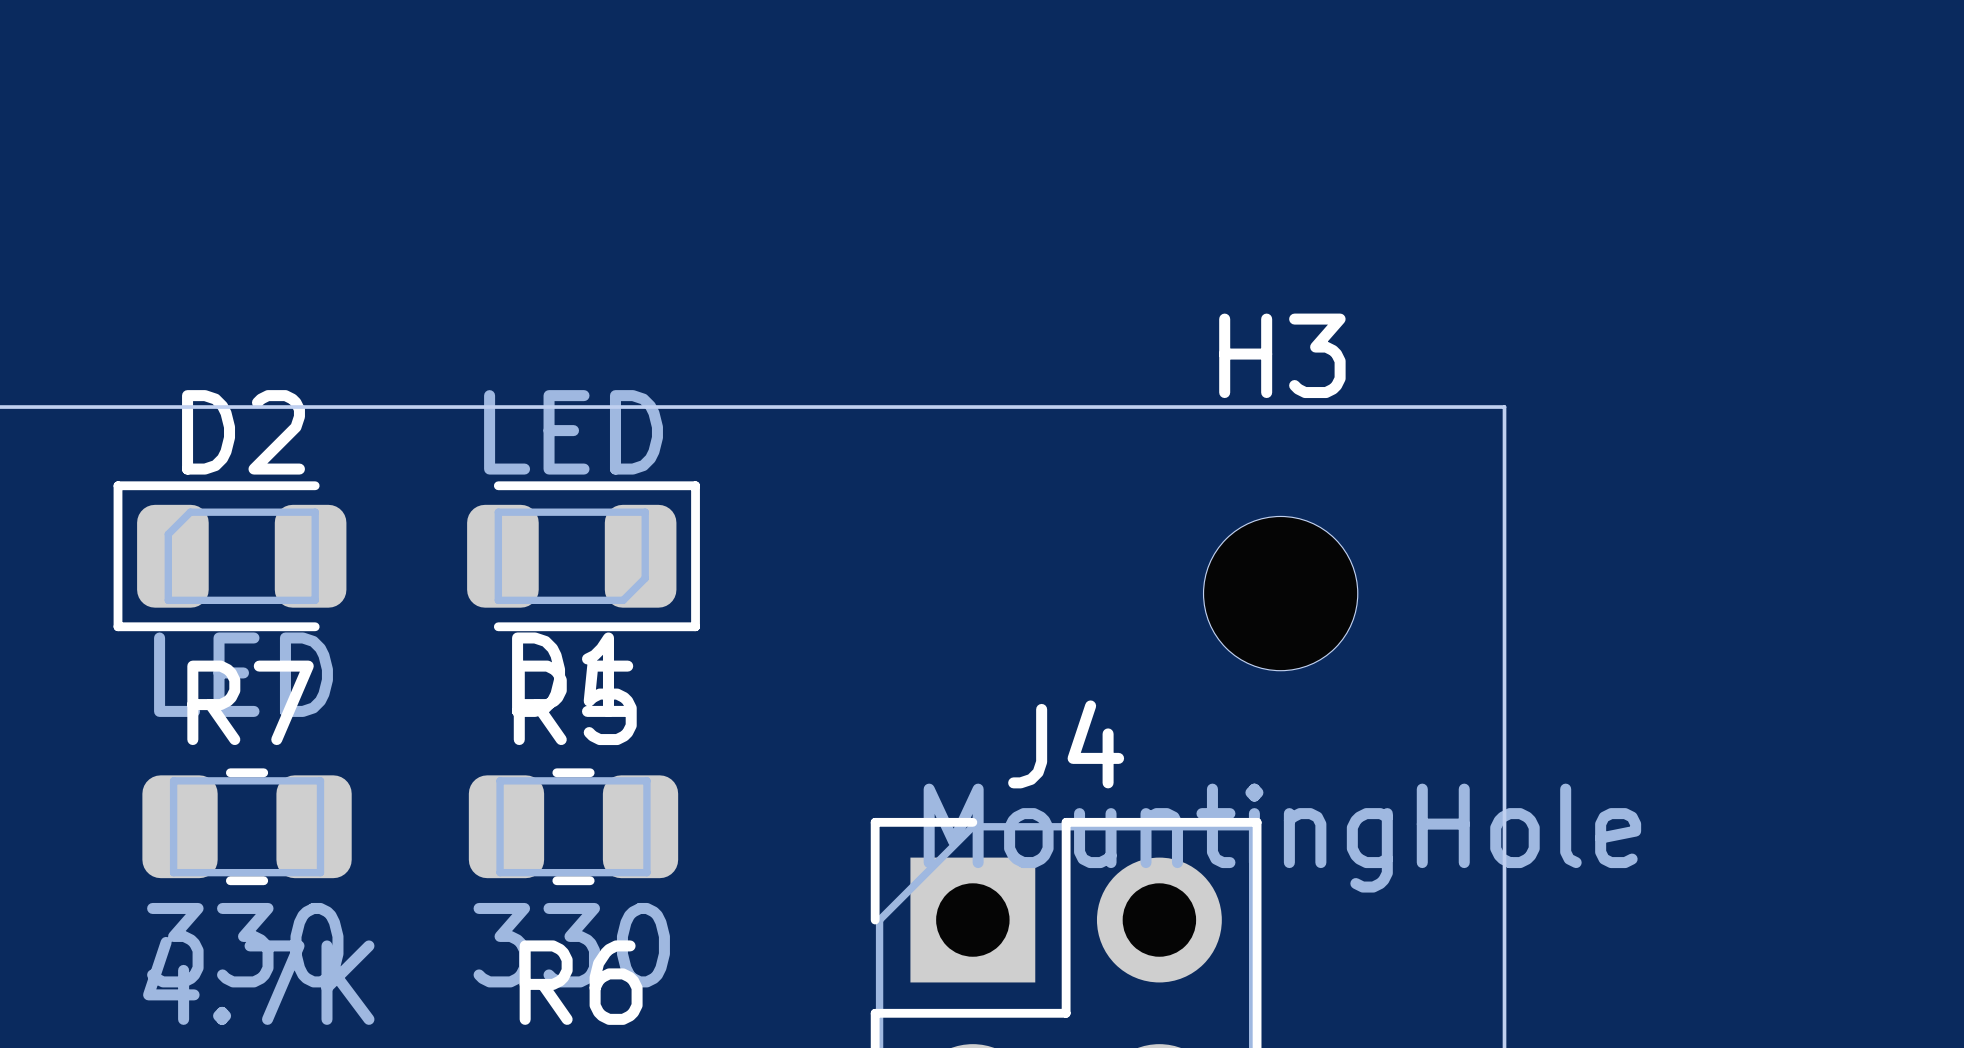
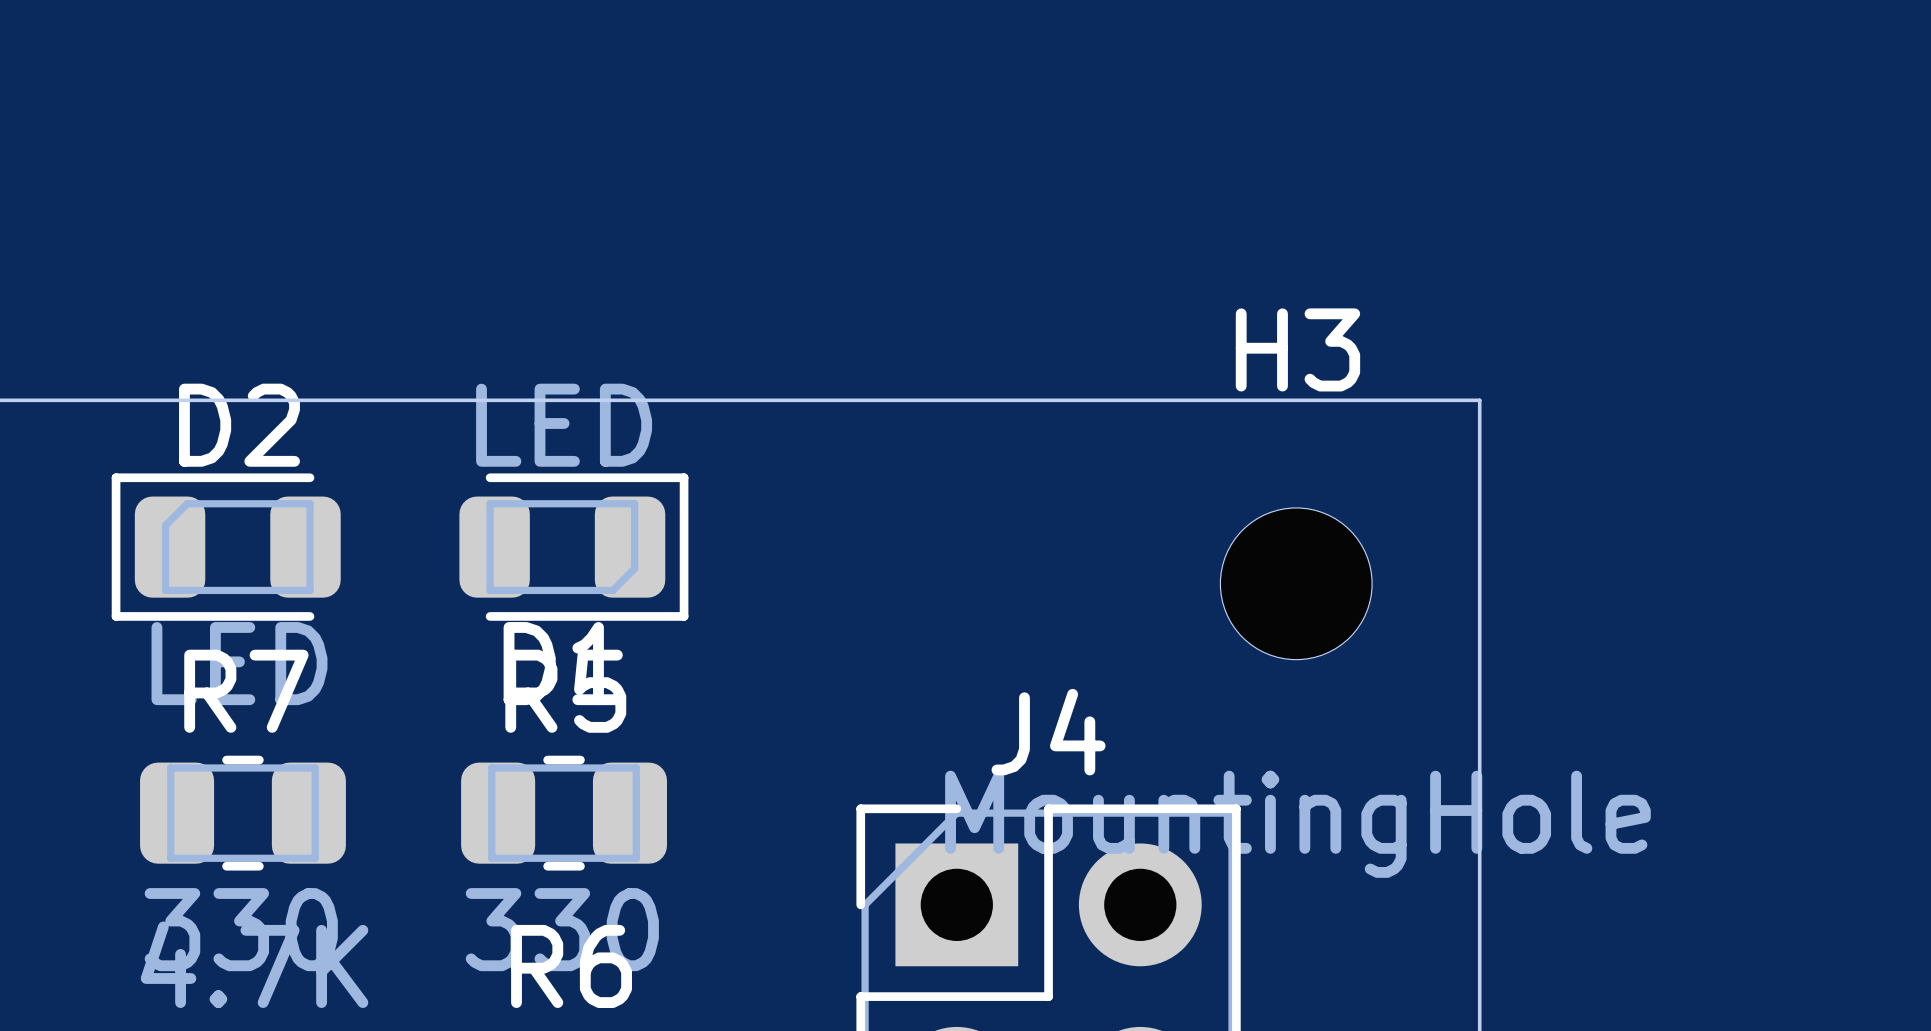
H3 position: (1280, 593) -> (1296, 583)

